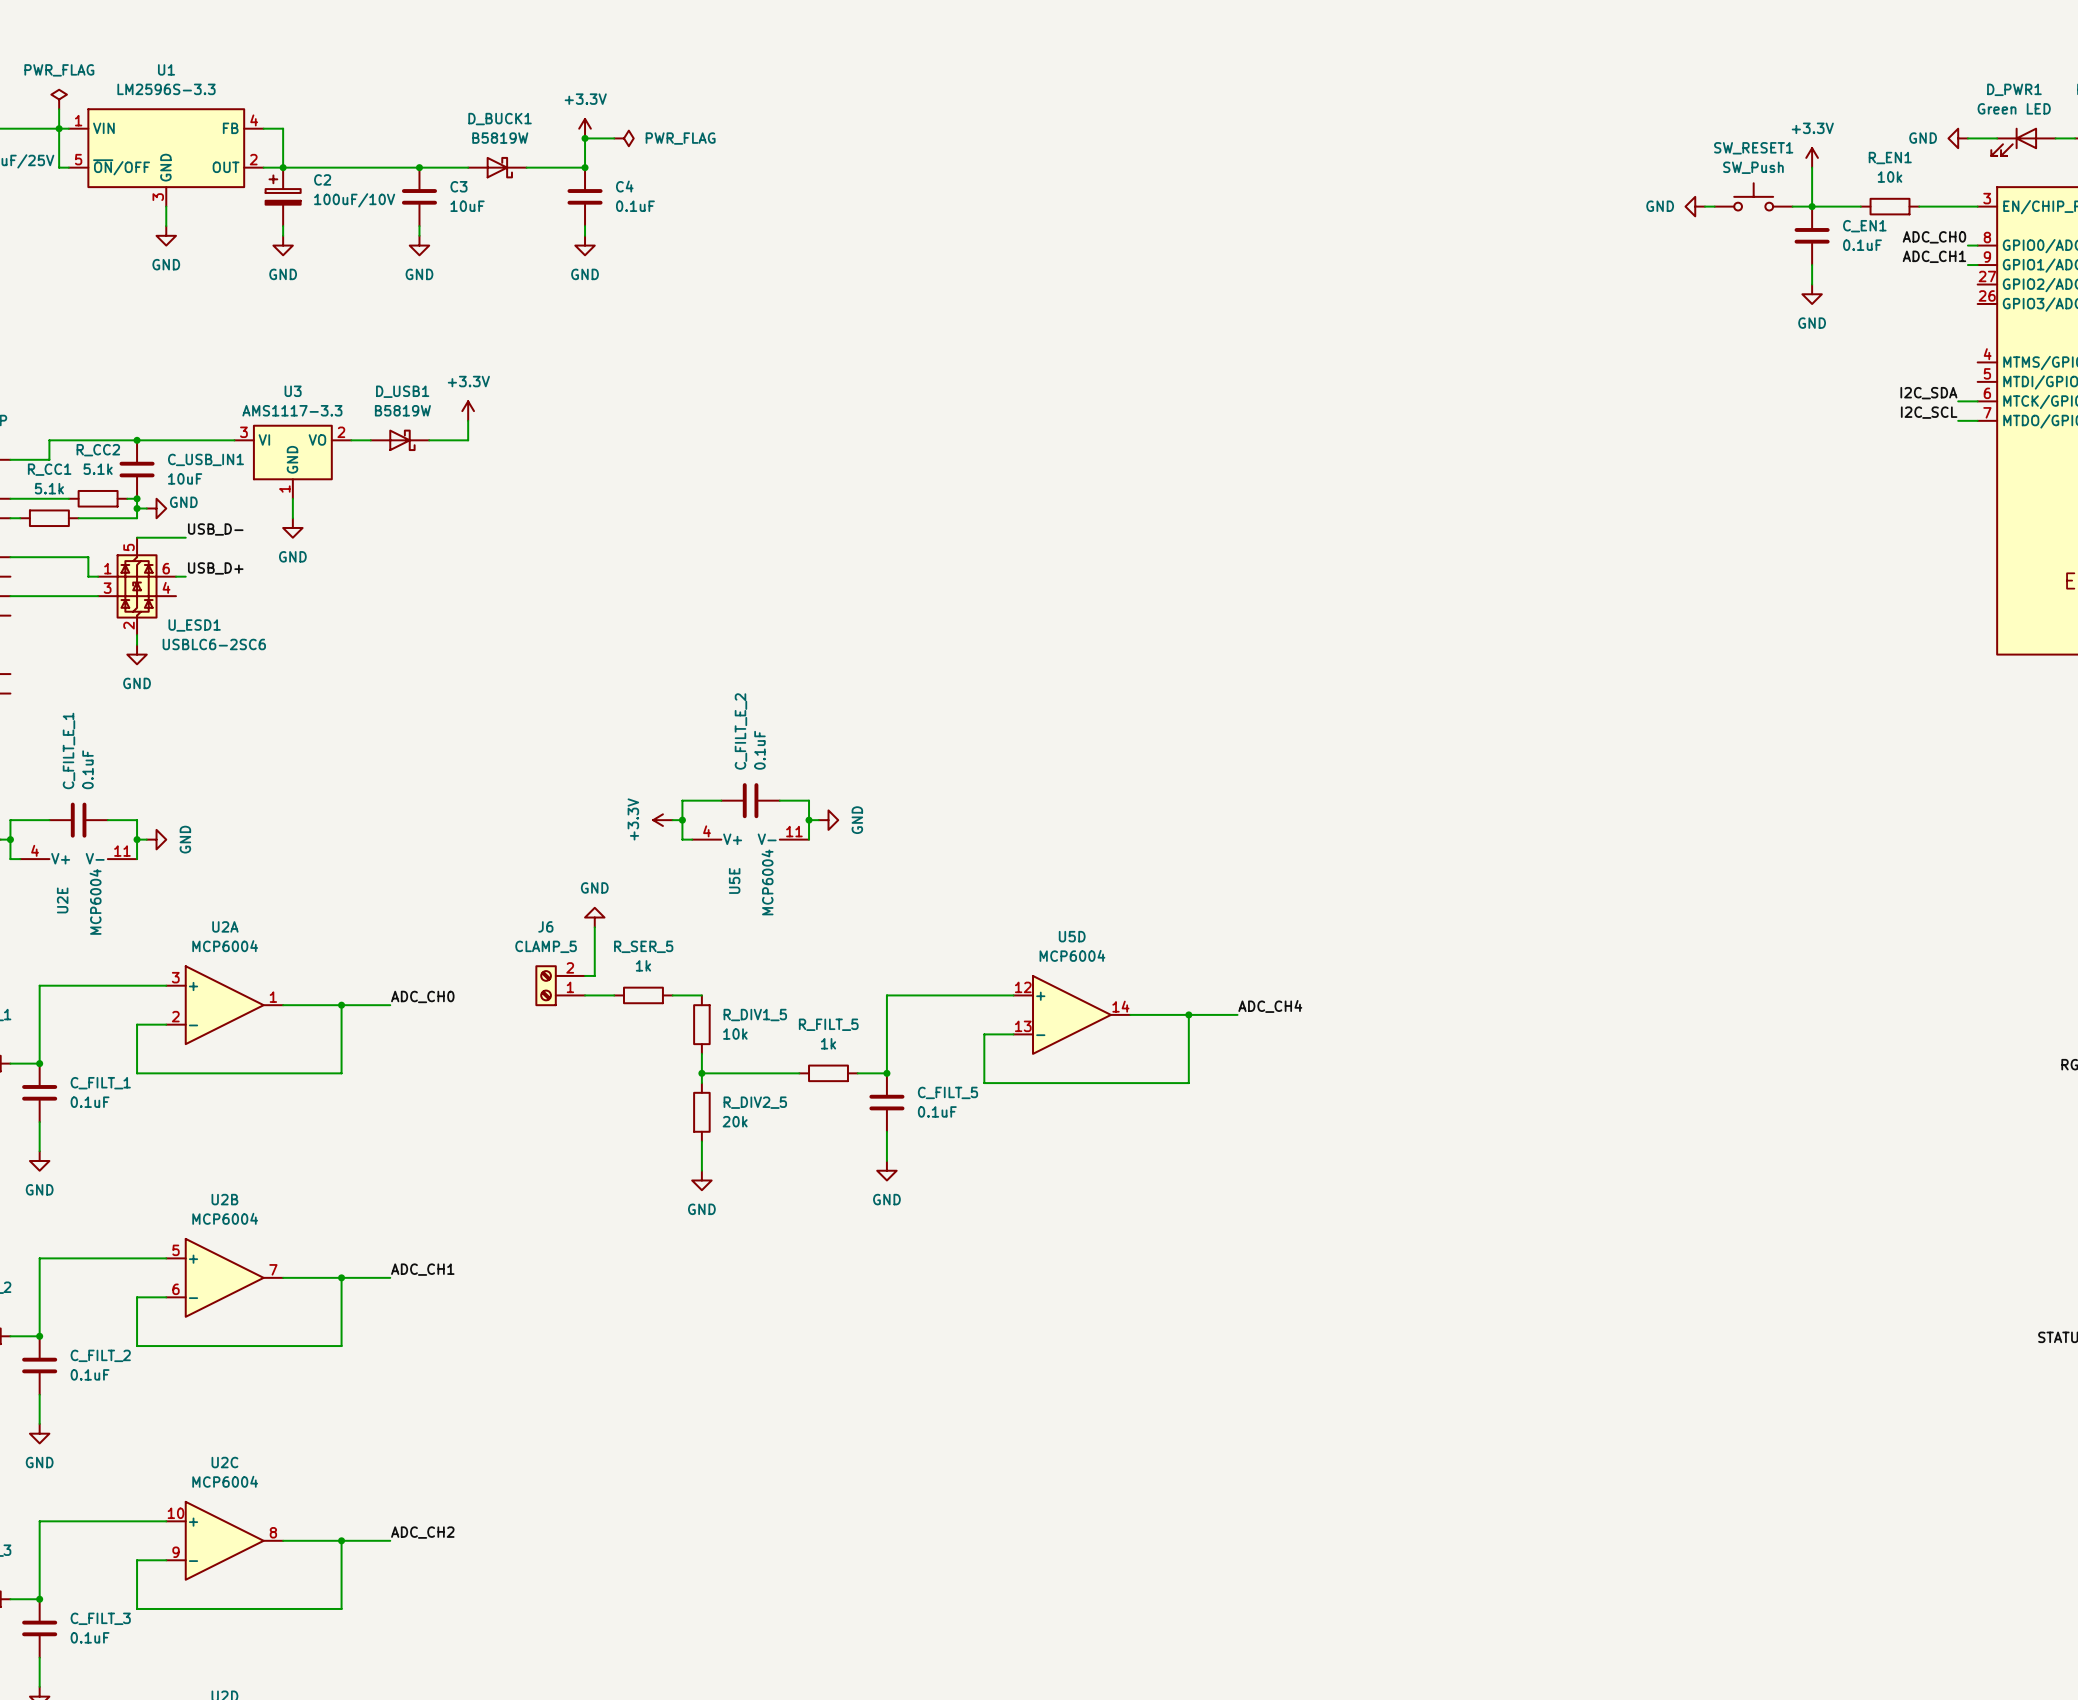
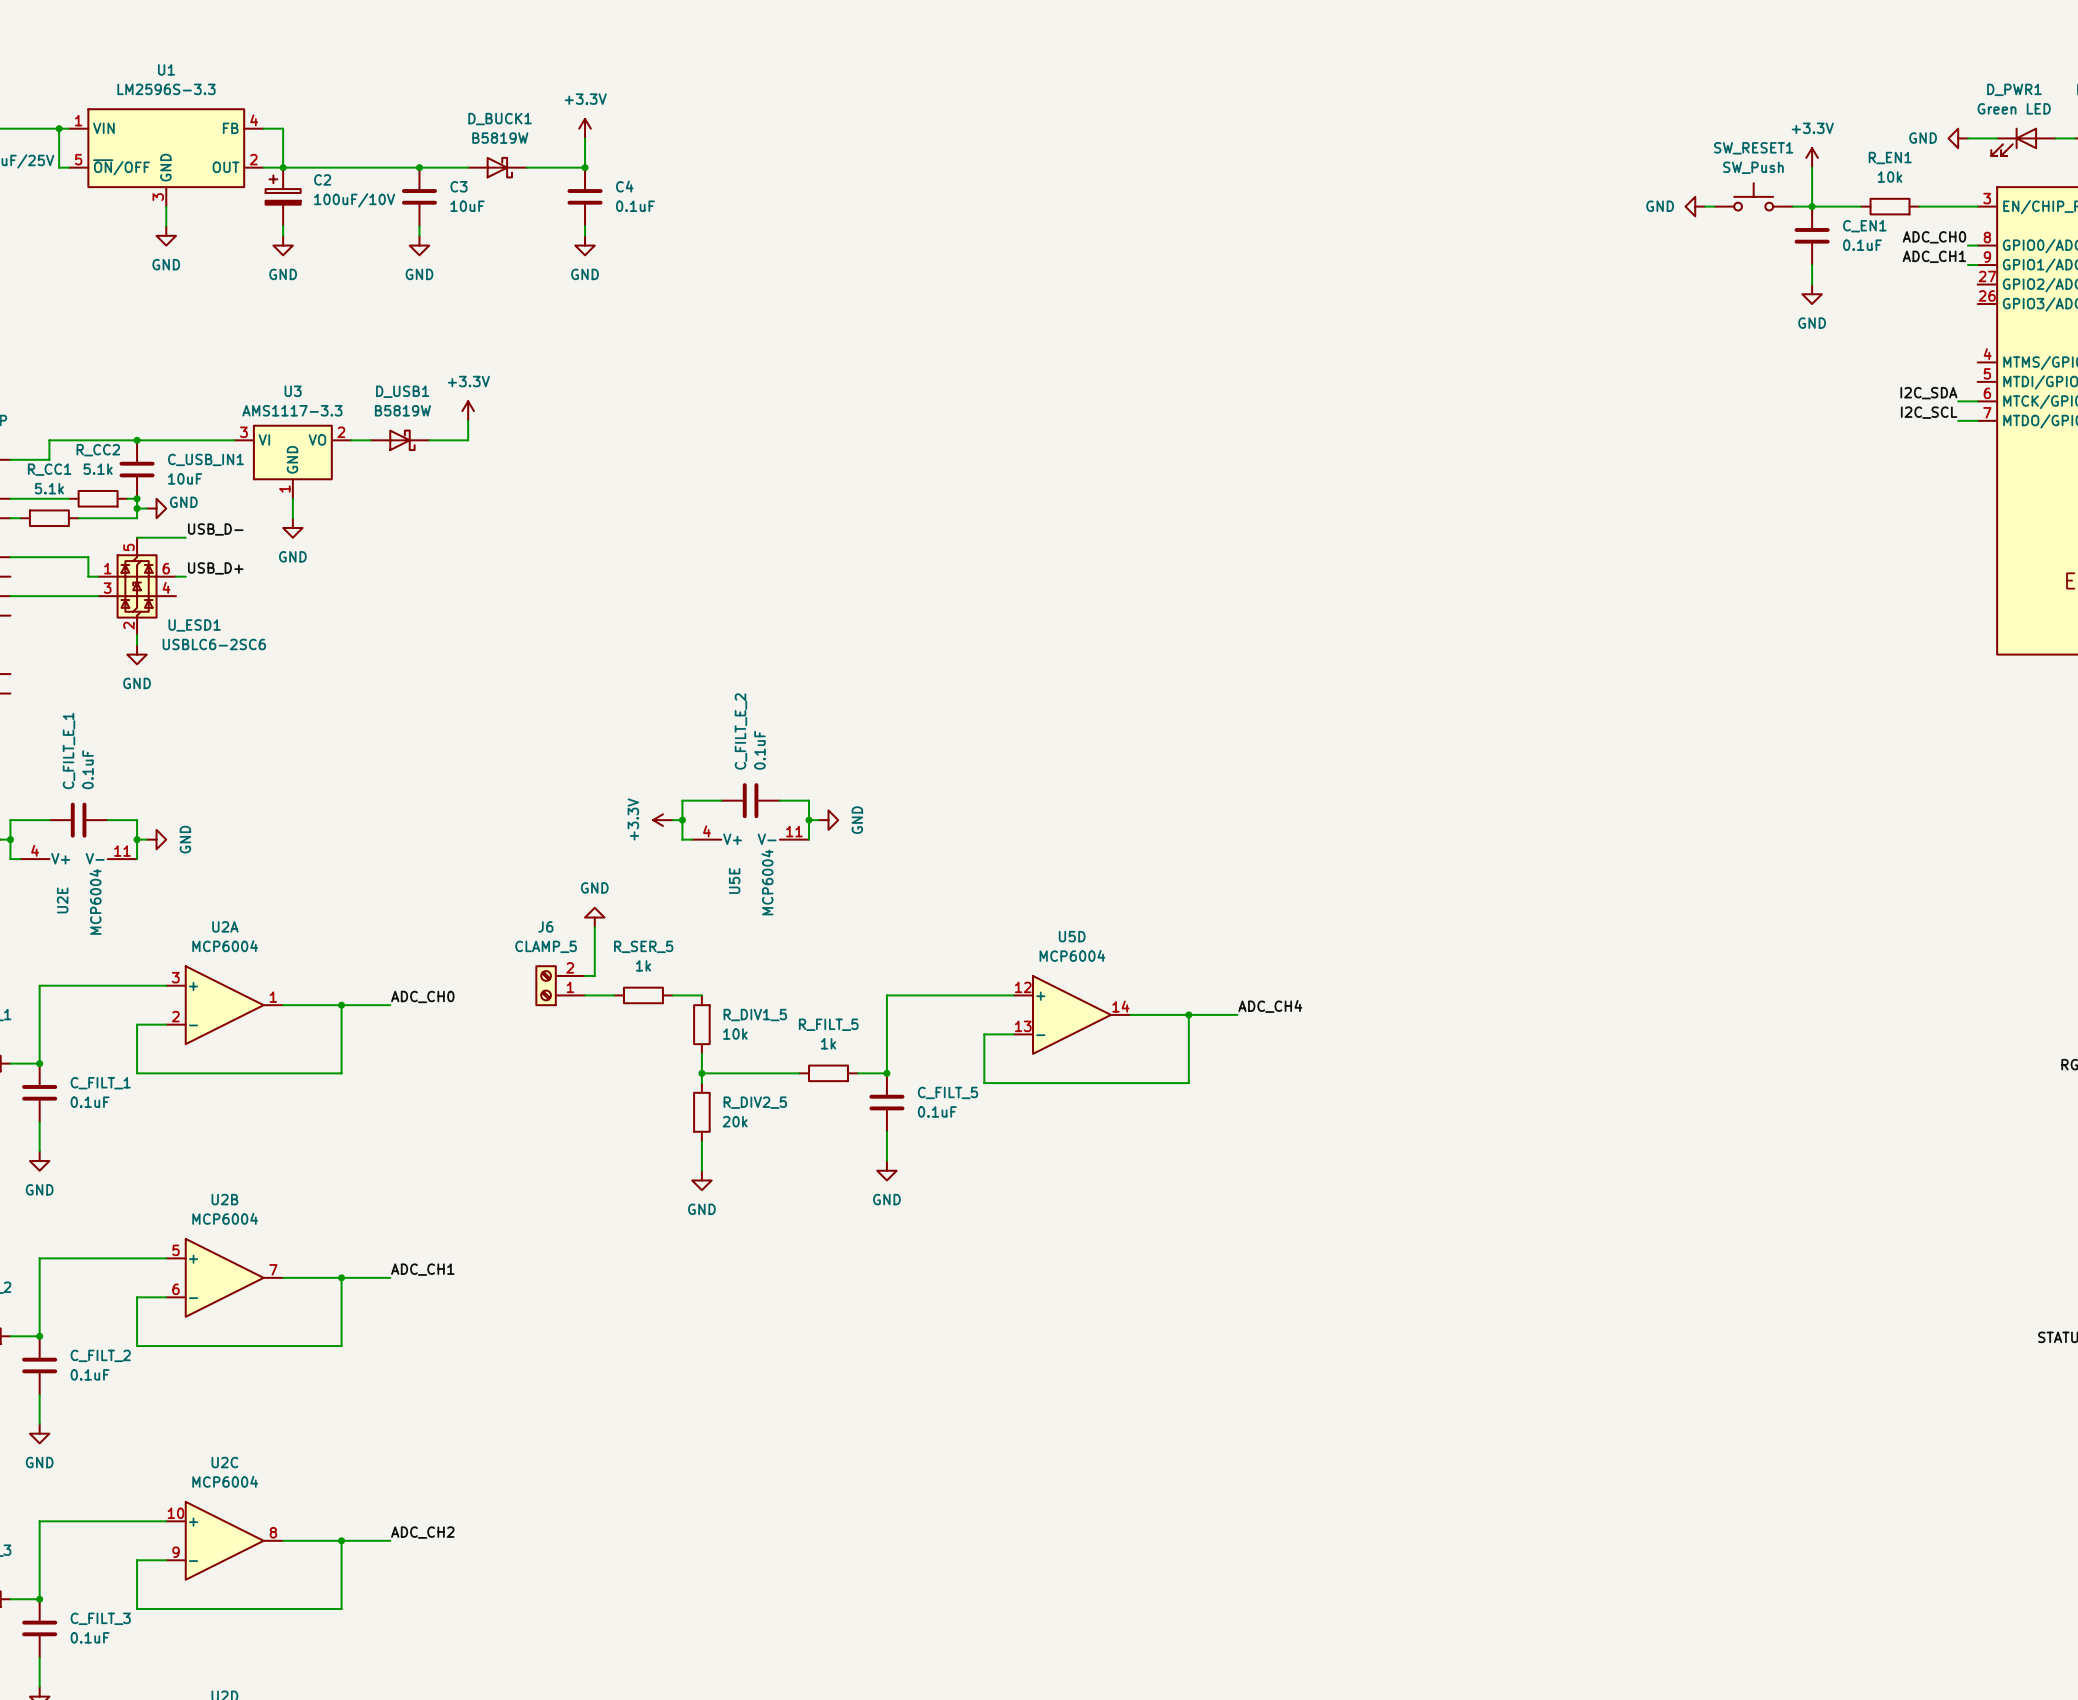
power symbol: PWR_FLAG (59, 99) -> none
wire: (59, 109) (59, 128) -> none
wire: (585, 138) (614, 138) -> none
junction: (585, 138) -> none
power symbol: PWR_FLAG (623, 138) -> none

